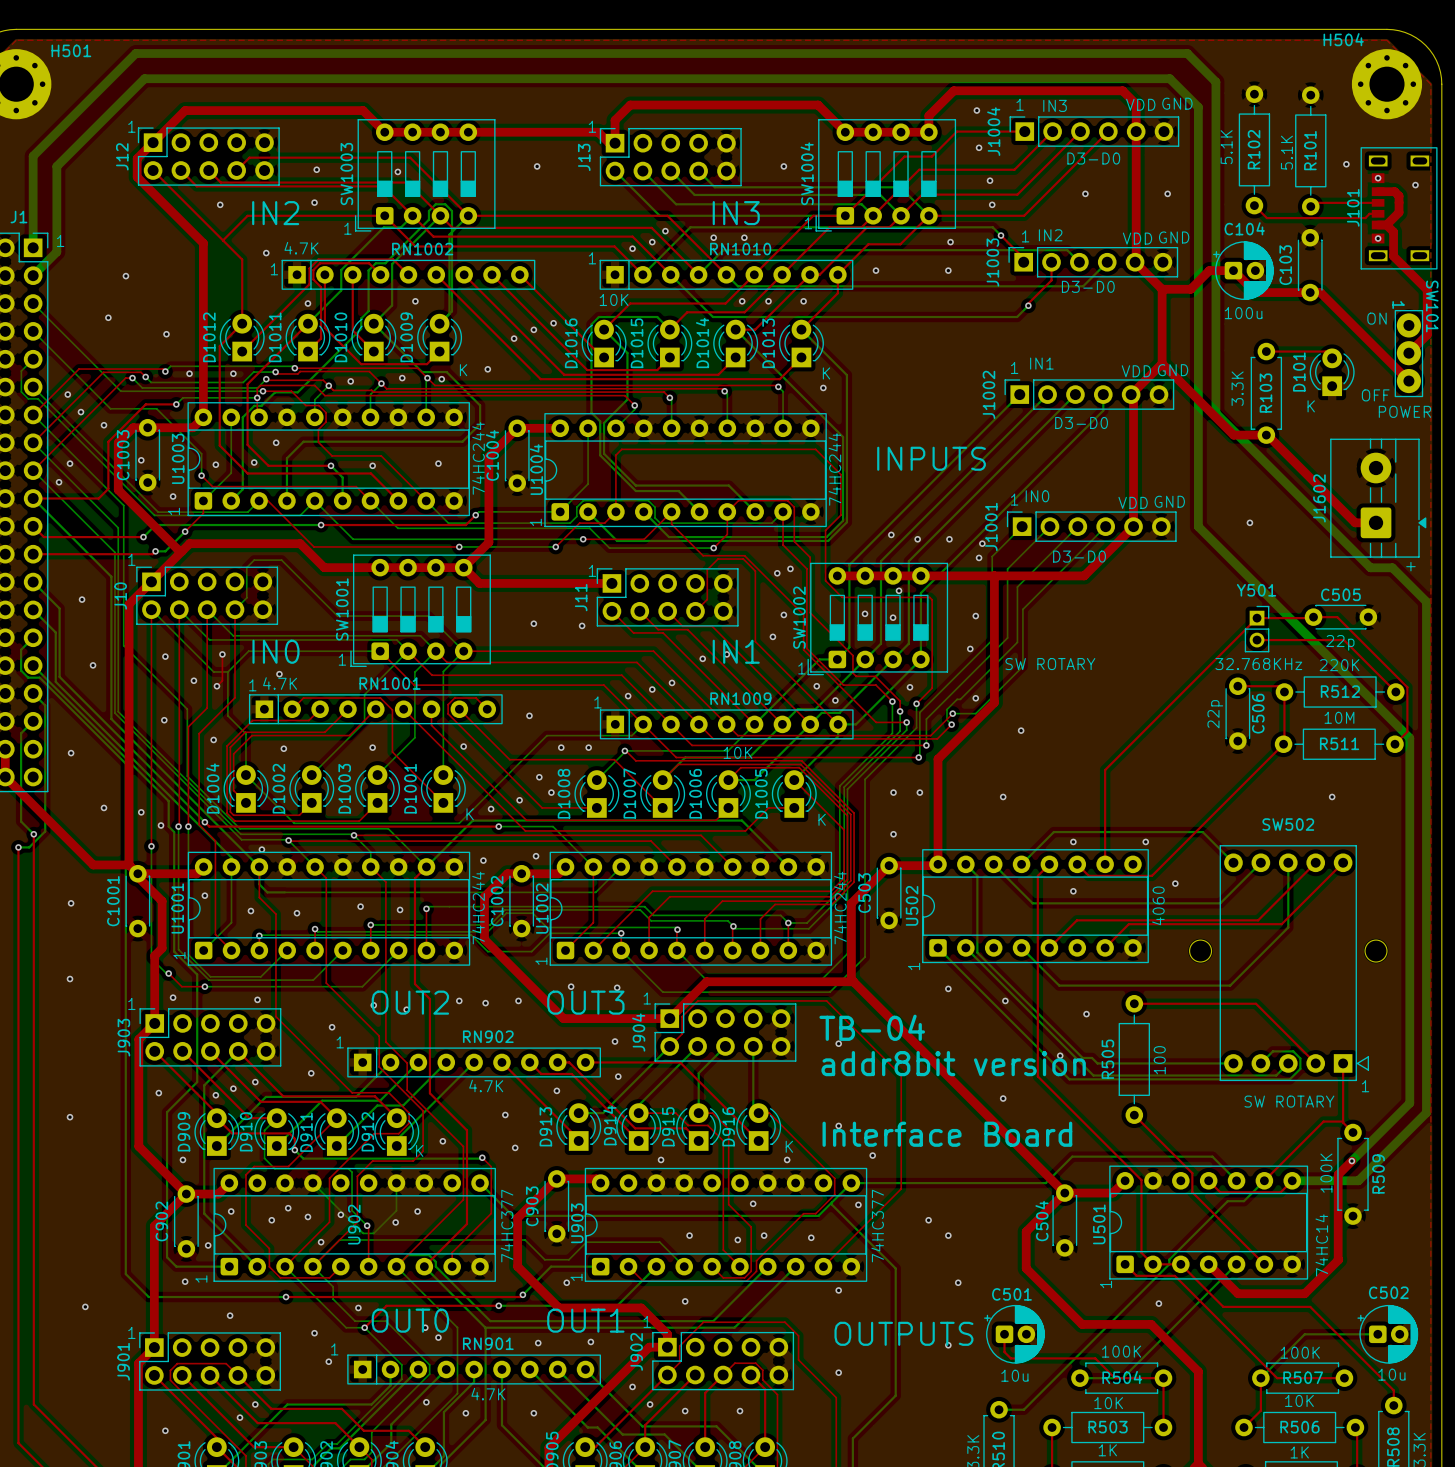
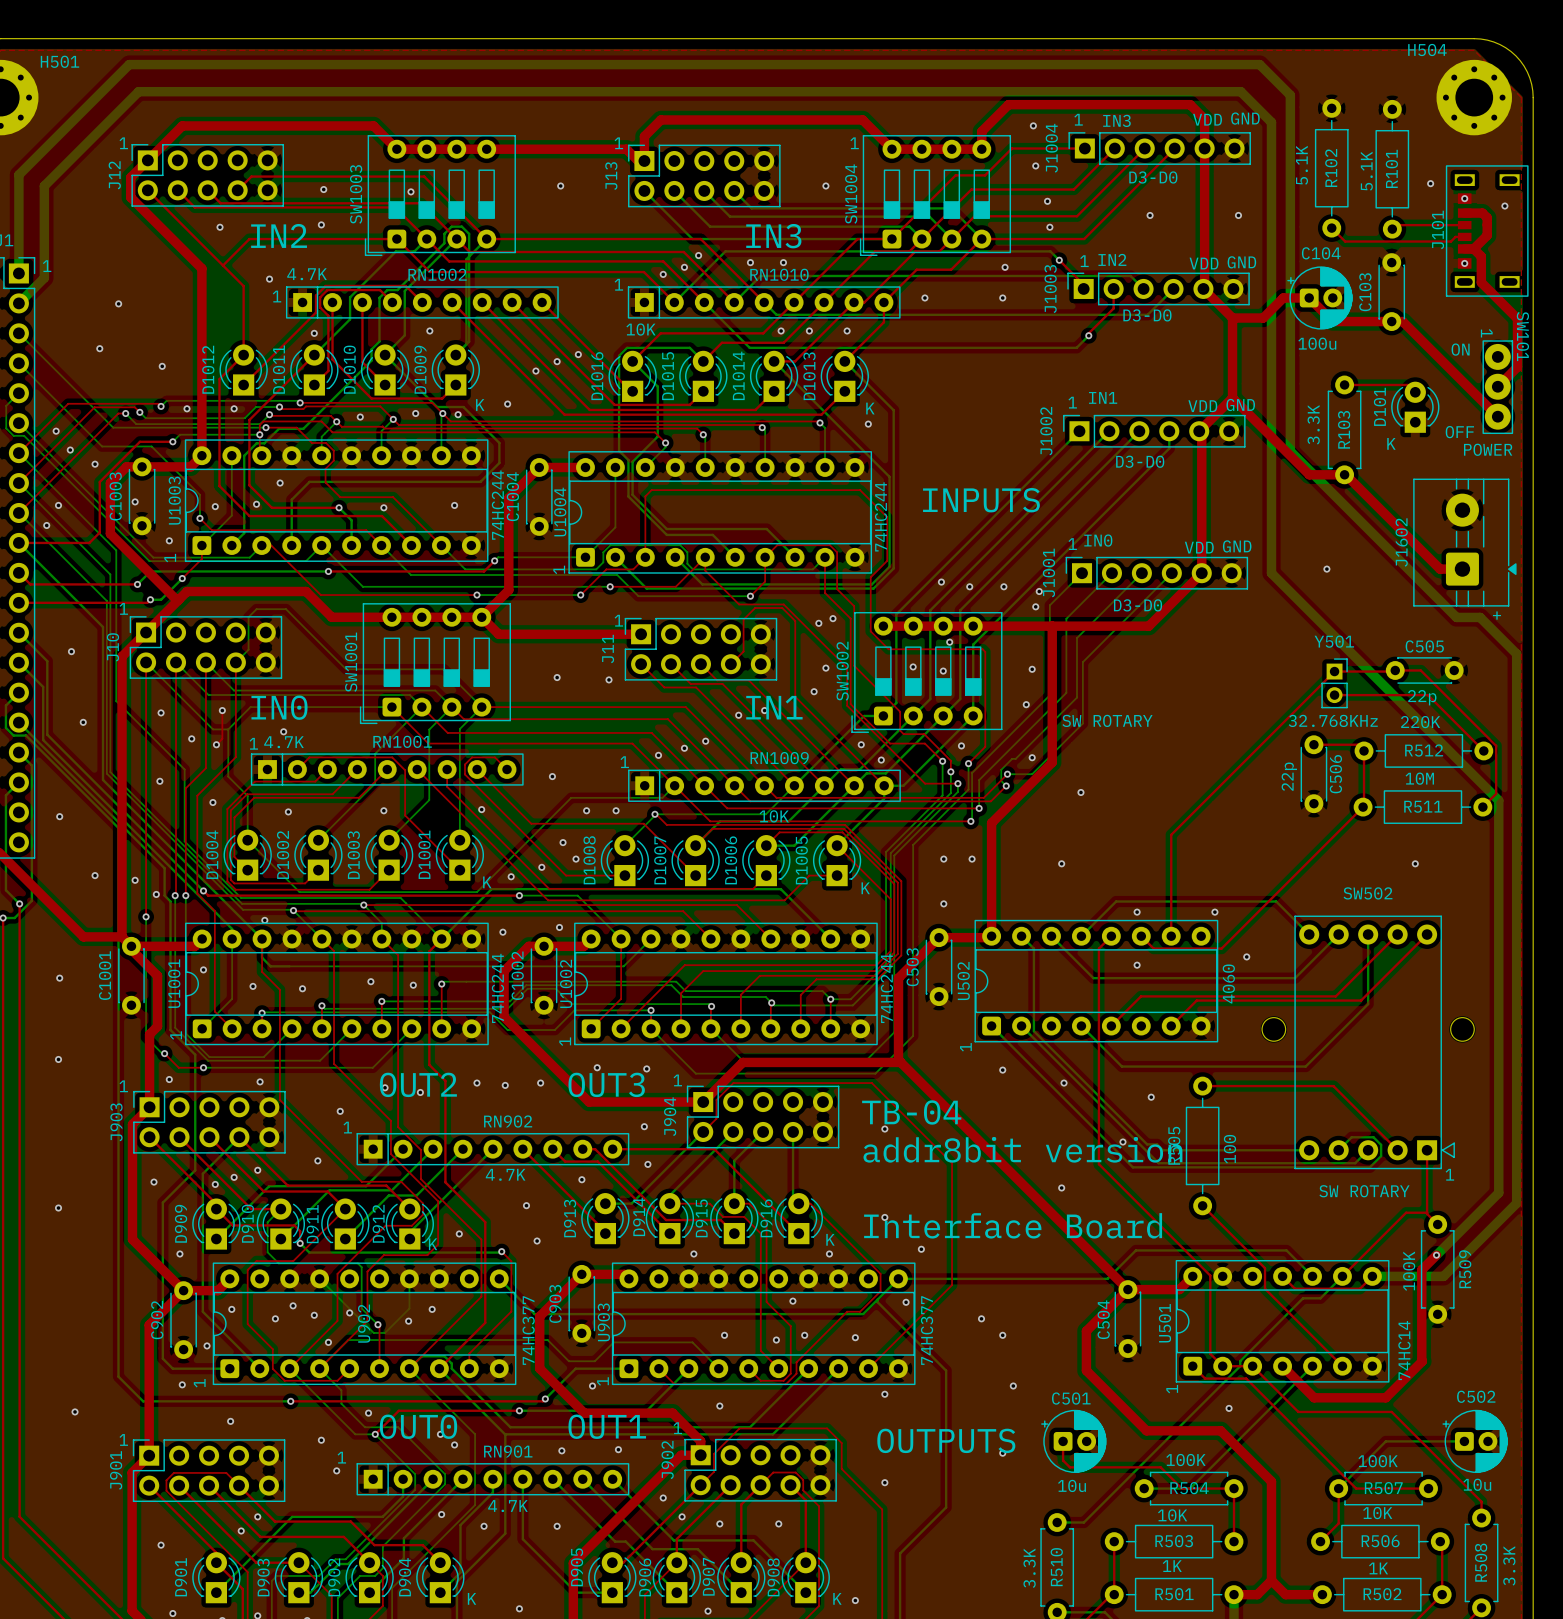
text position: 1 (808, 223) -> 1 (854, 143)
text: 1 (347, 228) -> none
text: 1 (342, 659) -> none
text: 1 (801, 668) -> none

